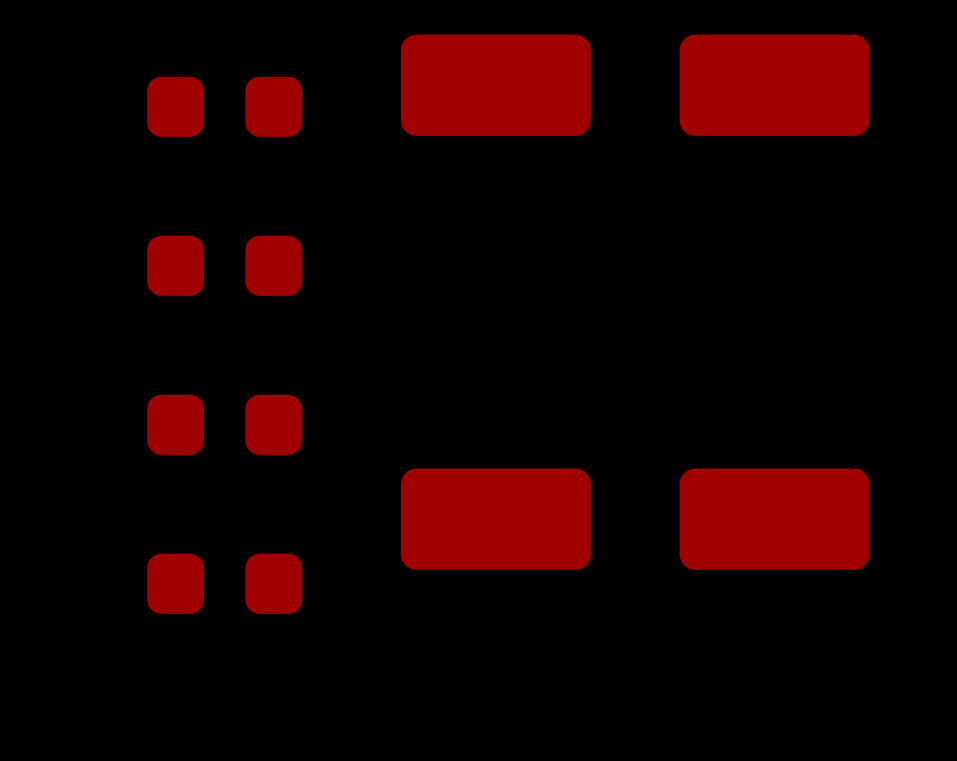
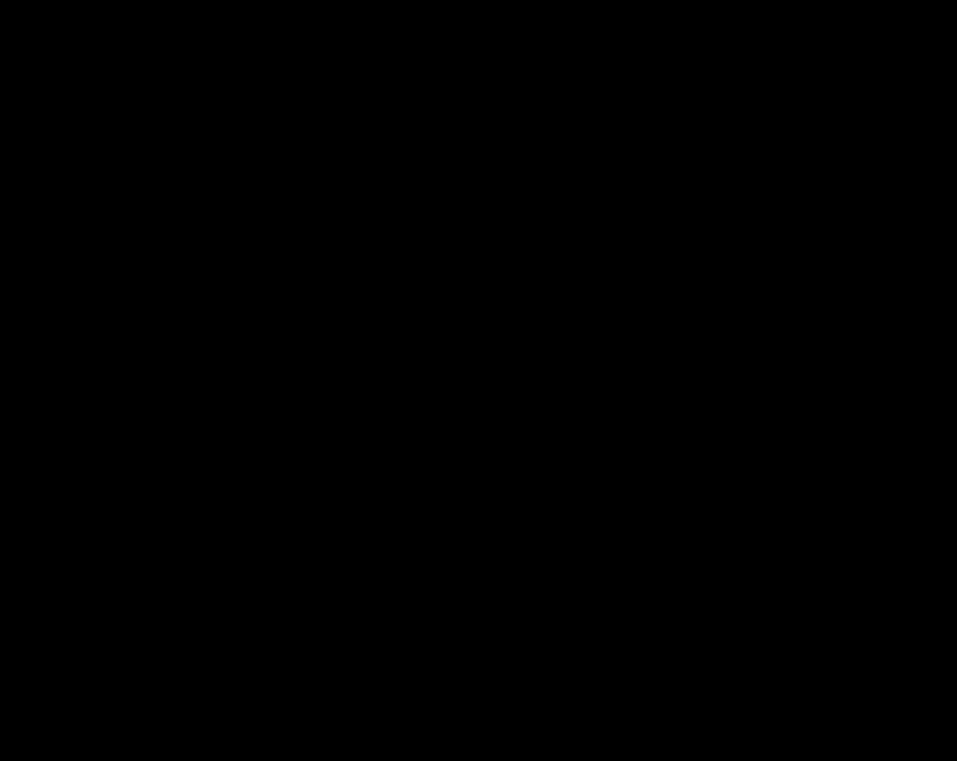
part: (635, 85) -> none
part: (224, 106) -> none
part: (224, 265) -> none
part: (224, 424) -> none
part: (635, 519) -> none
part: (224, 583) -> none

